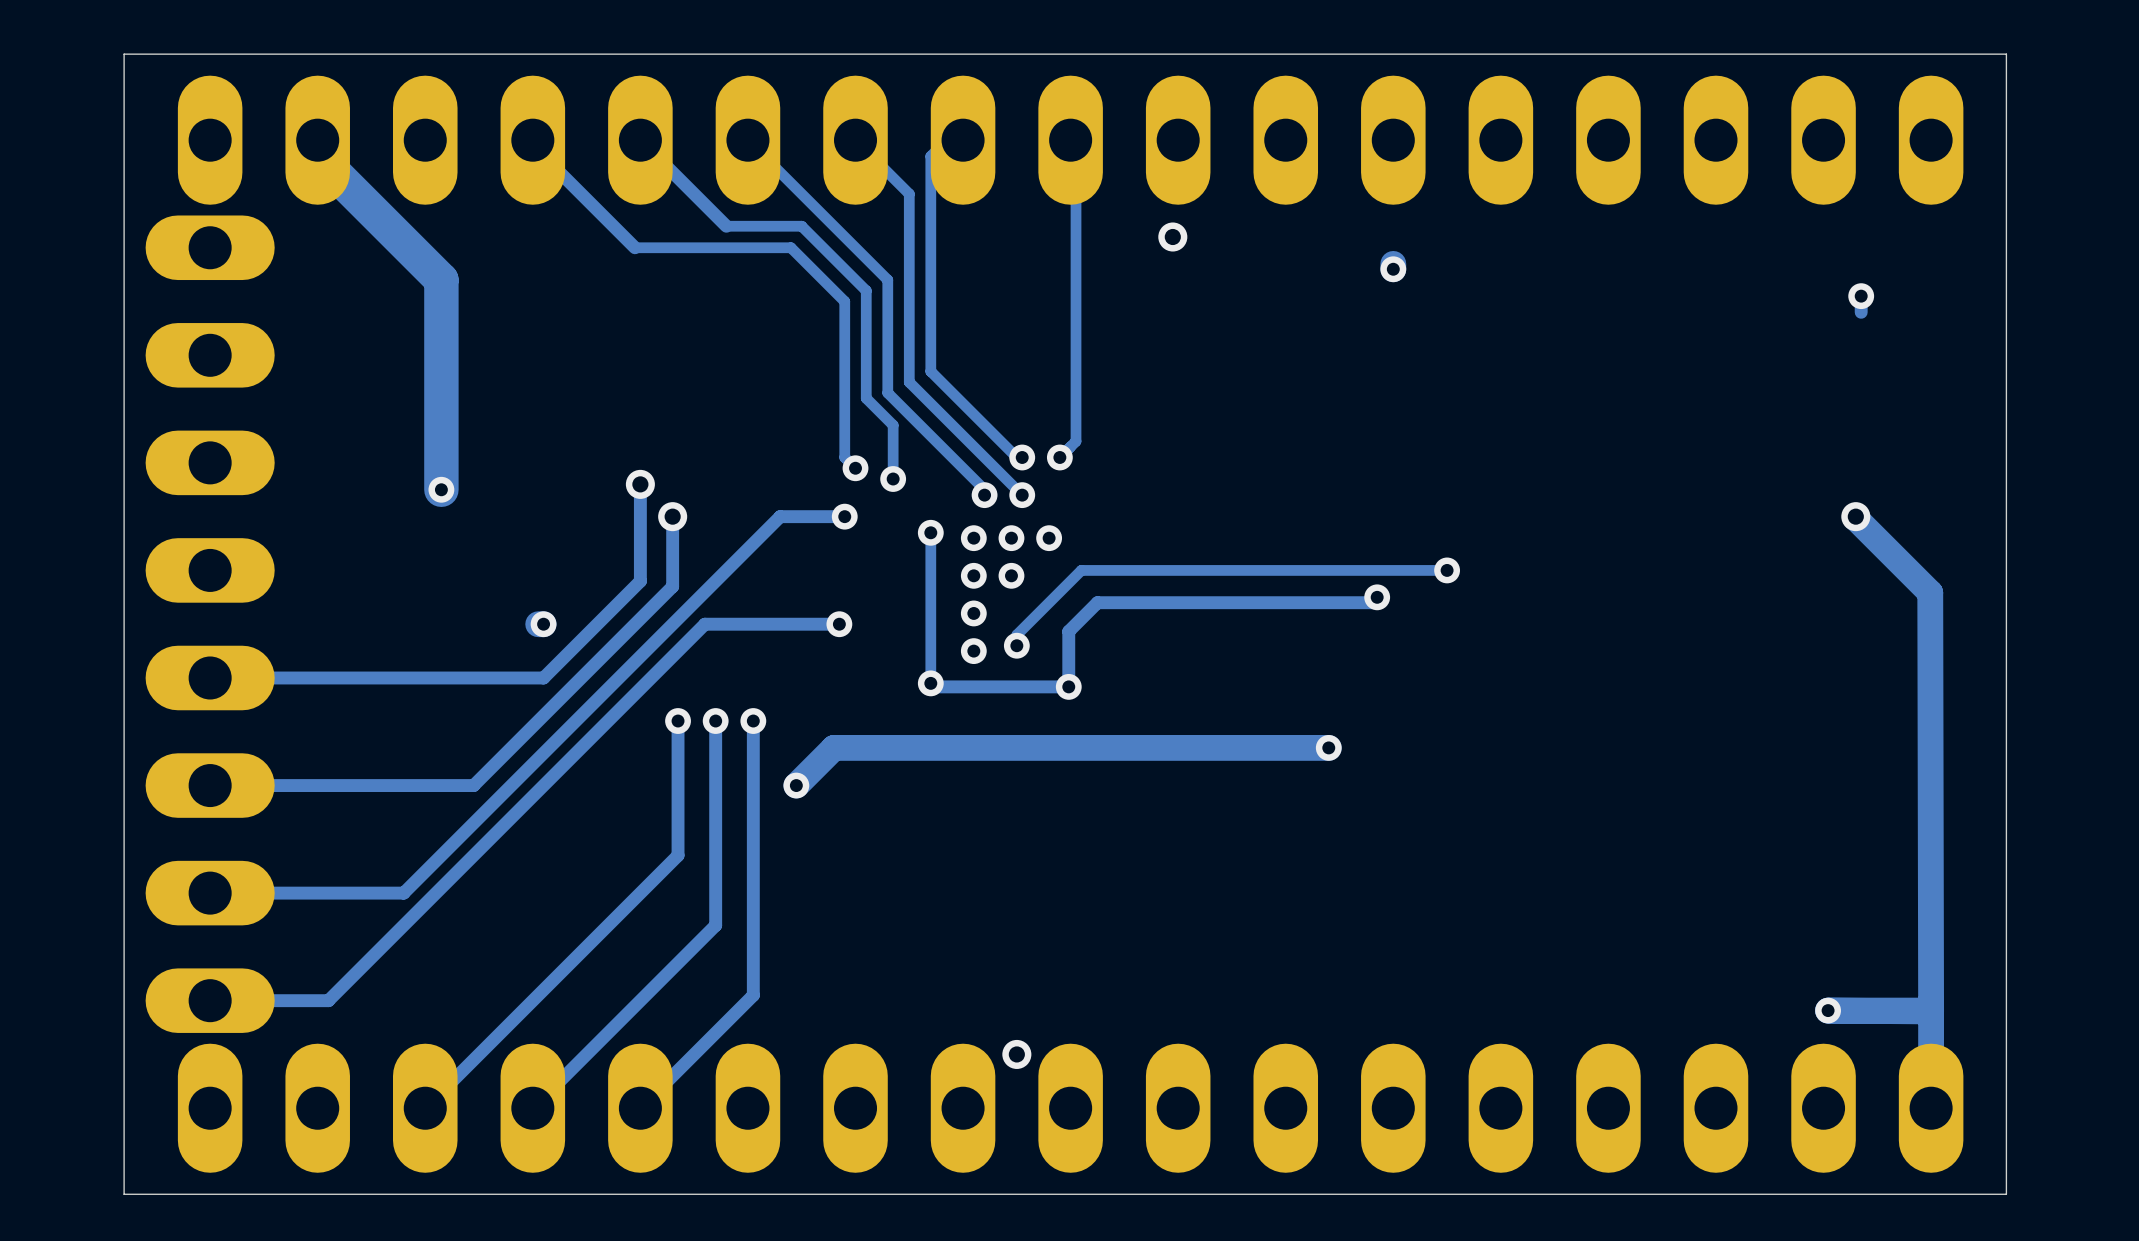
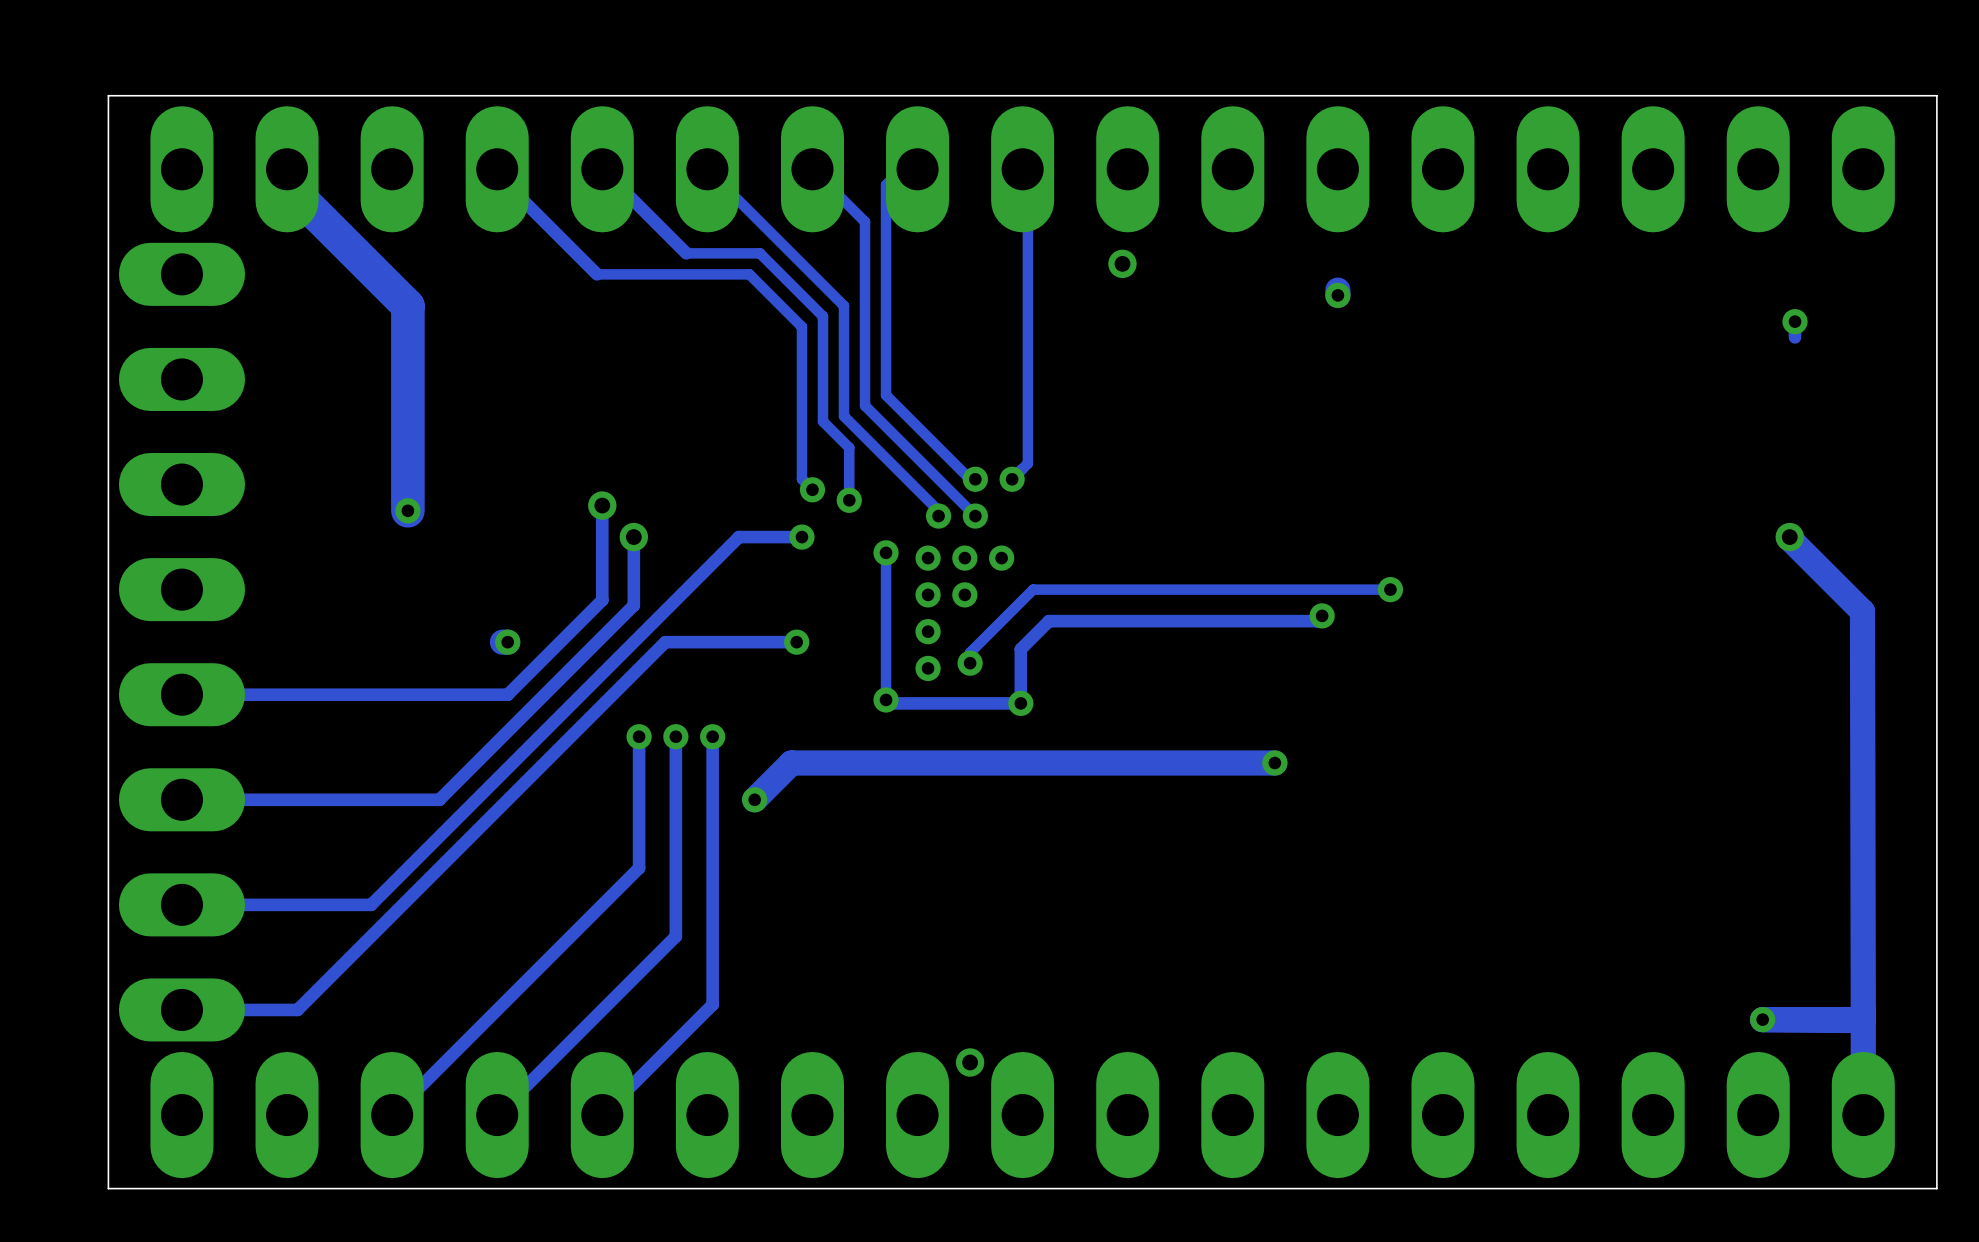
board edge: (2006, 64) (2006, 54) (124, 54) (124, 1194) (2006, 1194) (2006, 1183) -> (1936, 95) (108, 95) (108, 1188) (1936, 1188)

